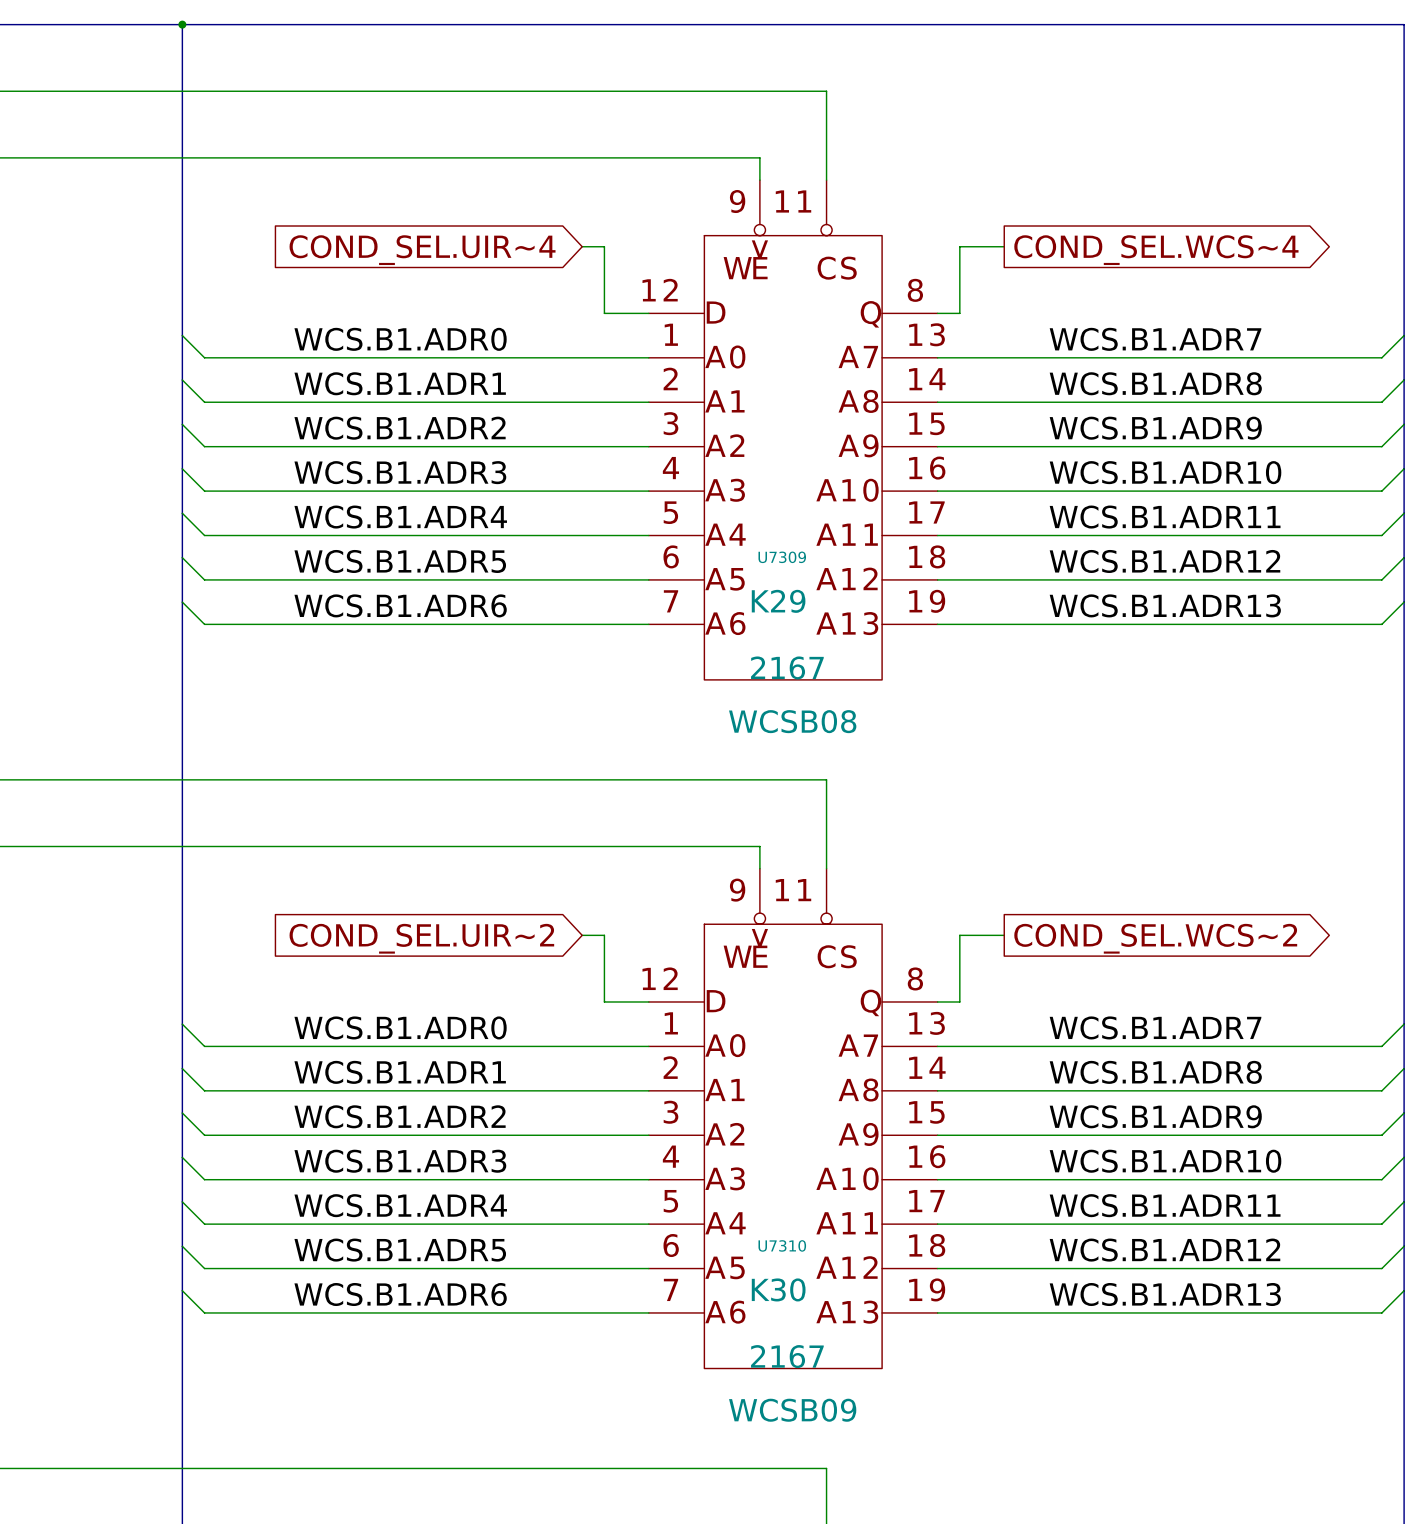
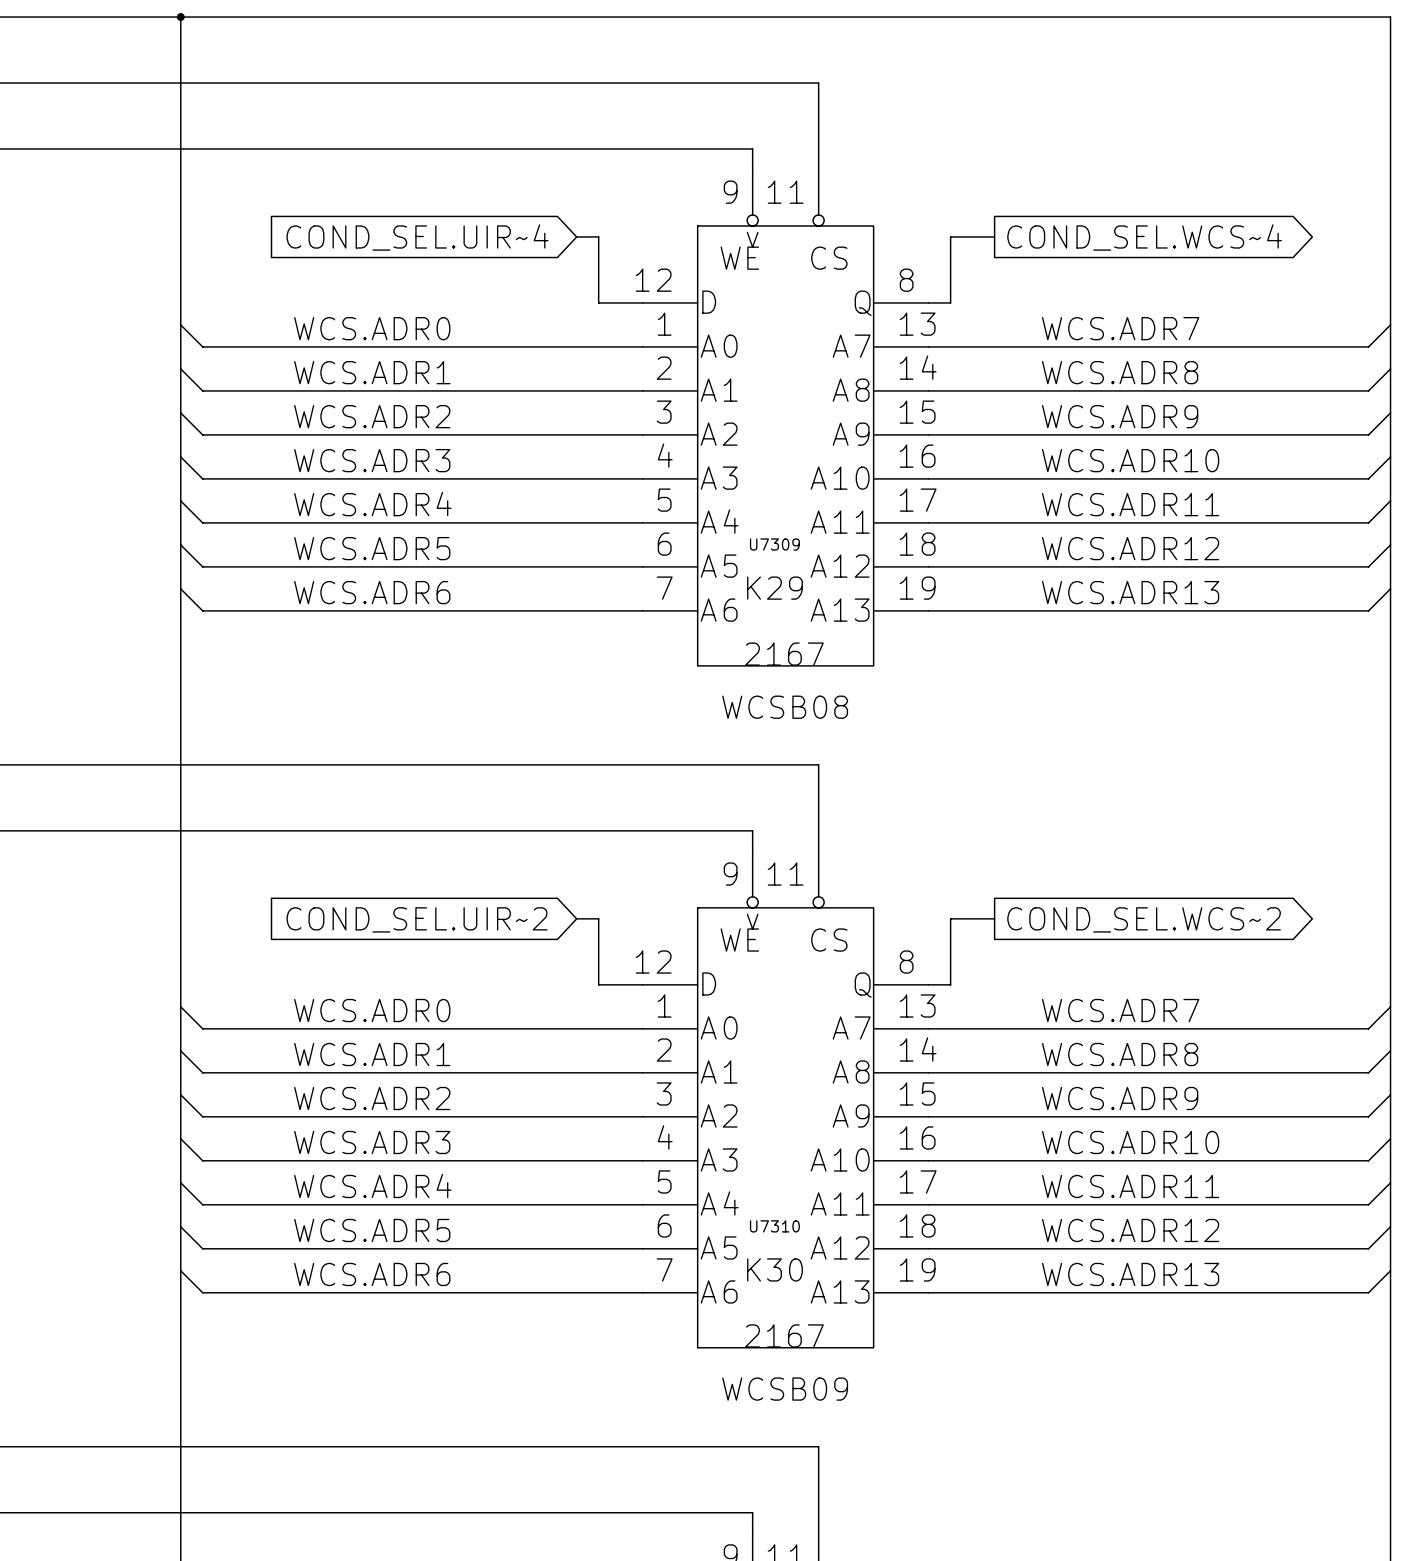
label: WCS.B1.ADR0 (400, 339) -> WCS.ADR0 (372, 328)
label: WCS.B1.ADR7 (1155, 339) -> WCS.ADR7 (1120, 328)
label: WCS.B1.ADR1 (400, 383) -> WCS.ADR1 (372, 372)
label: WCS.B1.ADR8 (1155, 383) -> WCS.ADR8 (1120, 372)
label: WCS.B1.ADR2 (400, 428) -> WCS.ADR2 (372, 416)
label: WCS.B1.ADR9 (1155, 428) -> WCS.ADR9 (1120, 416)
label: WCS.B1.ADR3 (400, 472) -> WCS.ADR3 (372, 460)
label: WCS.B1.ADR10 (1165, 472) -> WCS.ADR10 (1130, 460)
label: WCS.B1.ADR4 (400, 517) -> WCS.ADR4 (372, 504)
label: WCS.B1.ADR11 (1165, 517) -> WCS.ADR11 (1130, 504)
label: WCS.B1.ADR5 (400, 561) -> WCS.ADR5 (372, 548)
label: WCS.B1.ADR12 (1164, 561) -> WCS.ADR12 (1130, 548)
label: WCS.B1.ADR6 (400, 605) -> WCS.ADR6 (372, 592)
label: WCS.B1.ADR13 (1165, 605) -> WCS.ADR13 (1130, 592)
label: WCS.B1.ADR0 (400, 1027) -> WCS.ADR0 (372, 1010)
label: WCS.B1.ADR7 (1155, 1027) -> WCS.ADR7 (1120, 1010)
label: WCS.B1.ADR1 (400, 1072) -> WCS.ADR1 (372, 1054)
label: WCS.B1.ADR8 (1155, 1072) -> WCS.ADR8 (1120, 1054)
label: WCS.B1.ADR2 (400, 1116) -> WCS.ADR2 (372, 1098)
label: WCS.B1.ADR9 (1155, 1116) -> WCS.ADR9 (1120, 1098)
label: WCS.B1.ADR3 (400, 1161) -> WCS.ADR3 (372, 1142)
label: WCS.B1.ADR10 (1165, 1161) -> WCS.ADR10 (1130, 1142)
label: WCS.B1.ADR4 (400, 1205) -> WCS.ADR4 (372, 1185)
label: WCS.B1.ADR11 (1165, 1205) -> WCS.ADR11 (1130, 1186)
label: WCS.B1.ADR5 (400, 1250) -> WCS.ADR5 (372, 1230)
label: WCS.B1.ADR12 (1164, 1250) -> WCS.ADR12 (1130, 1230)
label: WCS.B1.ADR6 (400, 1294) -> WCS.ADR6 (372, 1274)
label: WCS.B1.ADR13 (1165, 1294) -> WCS.ADR13 (1130, 1274)

